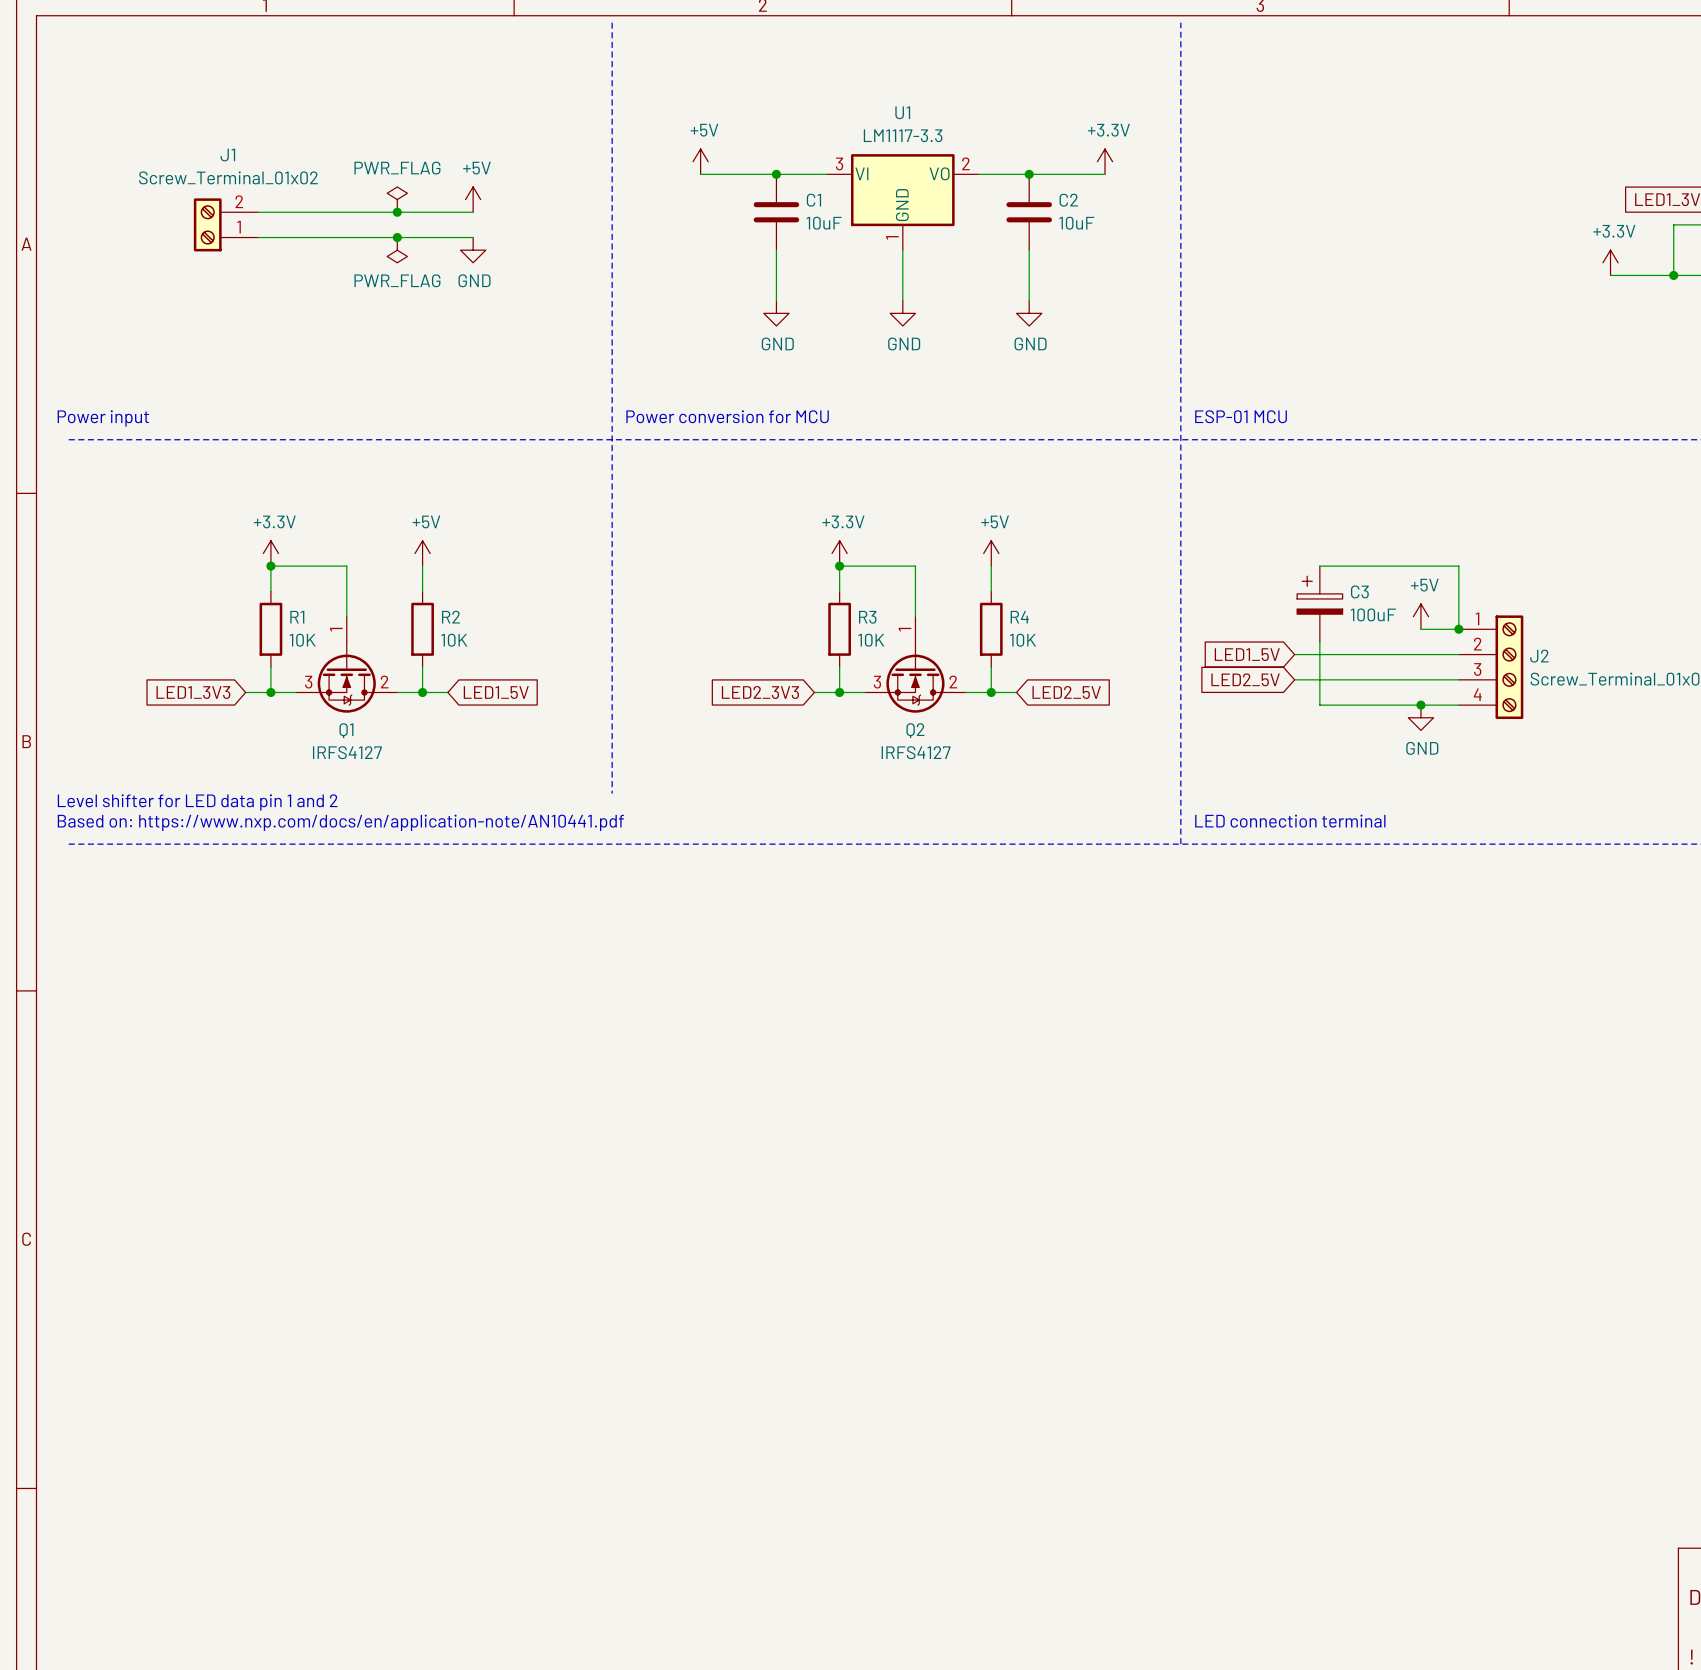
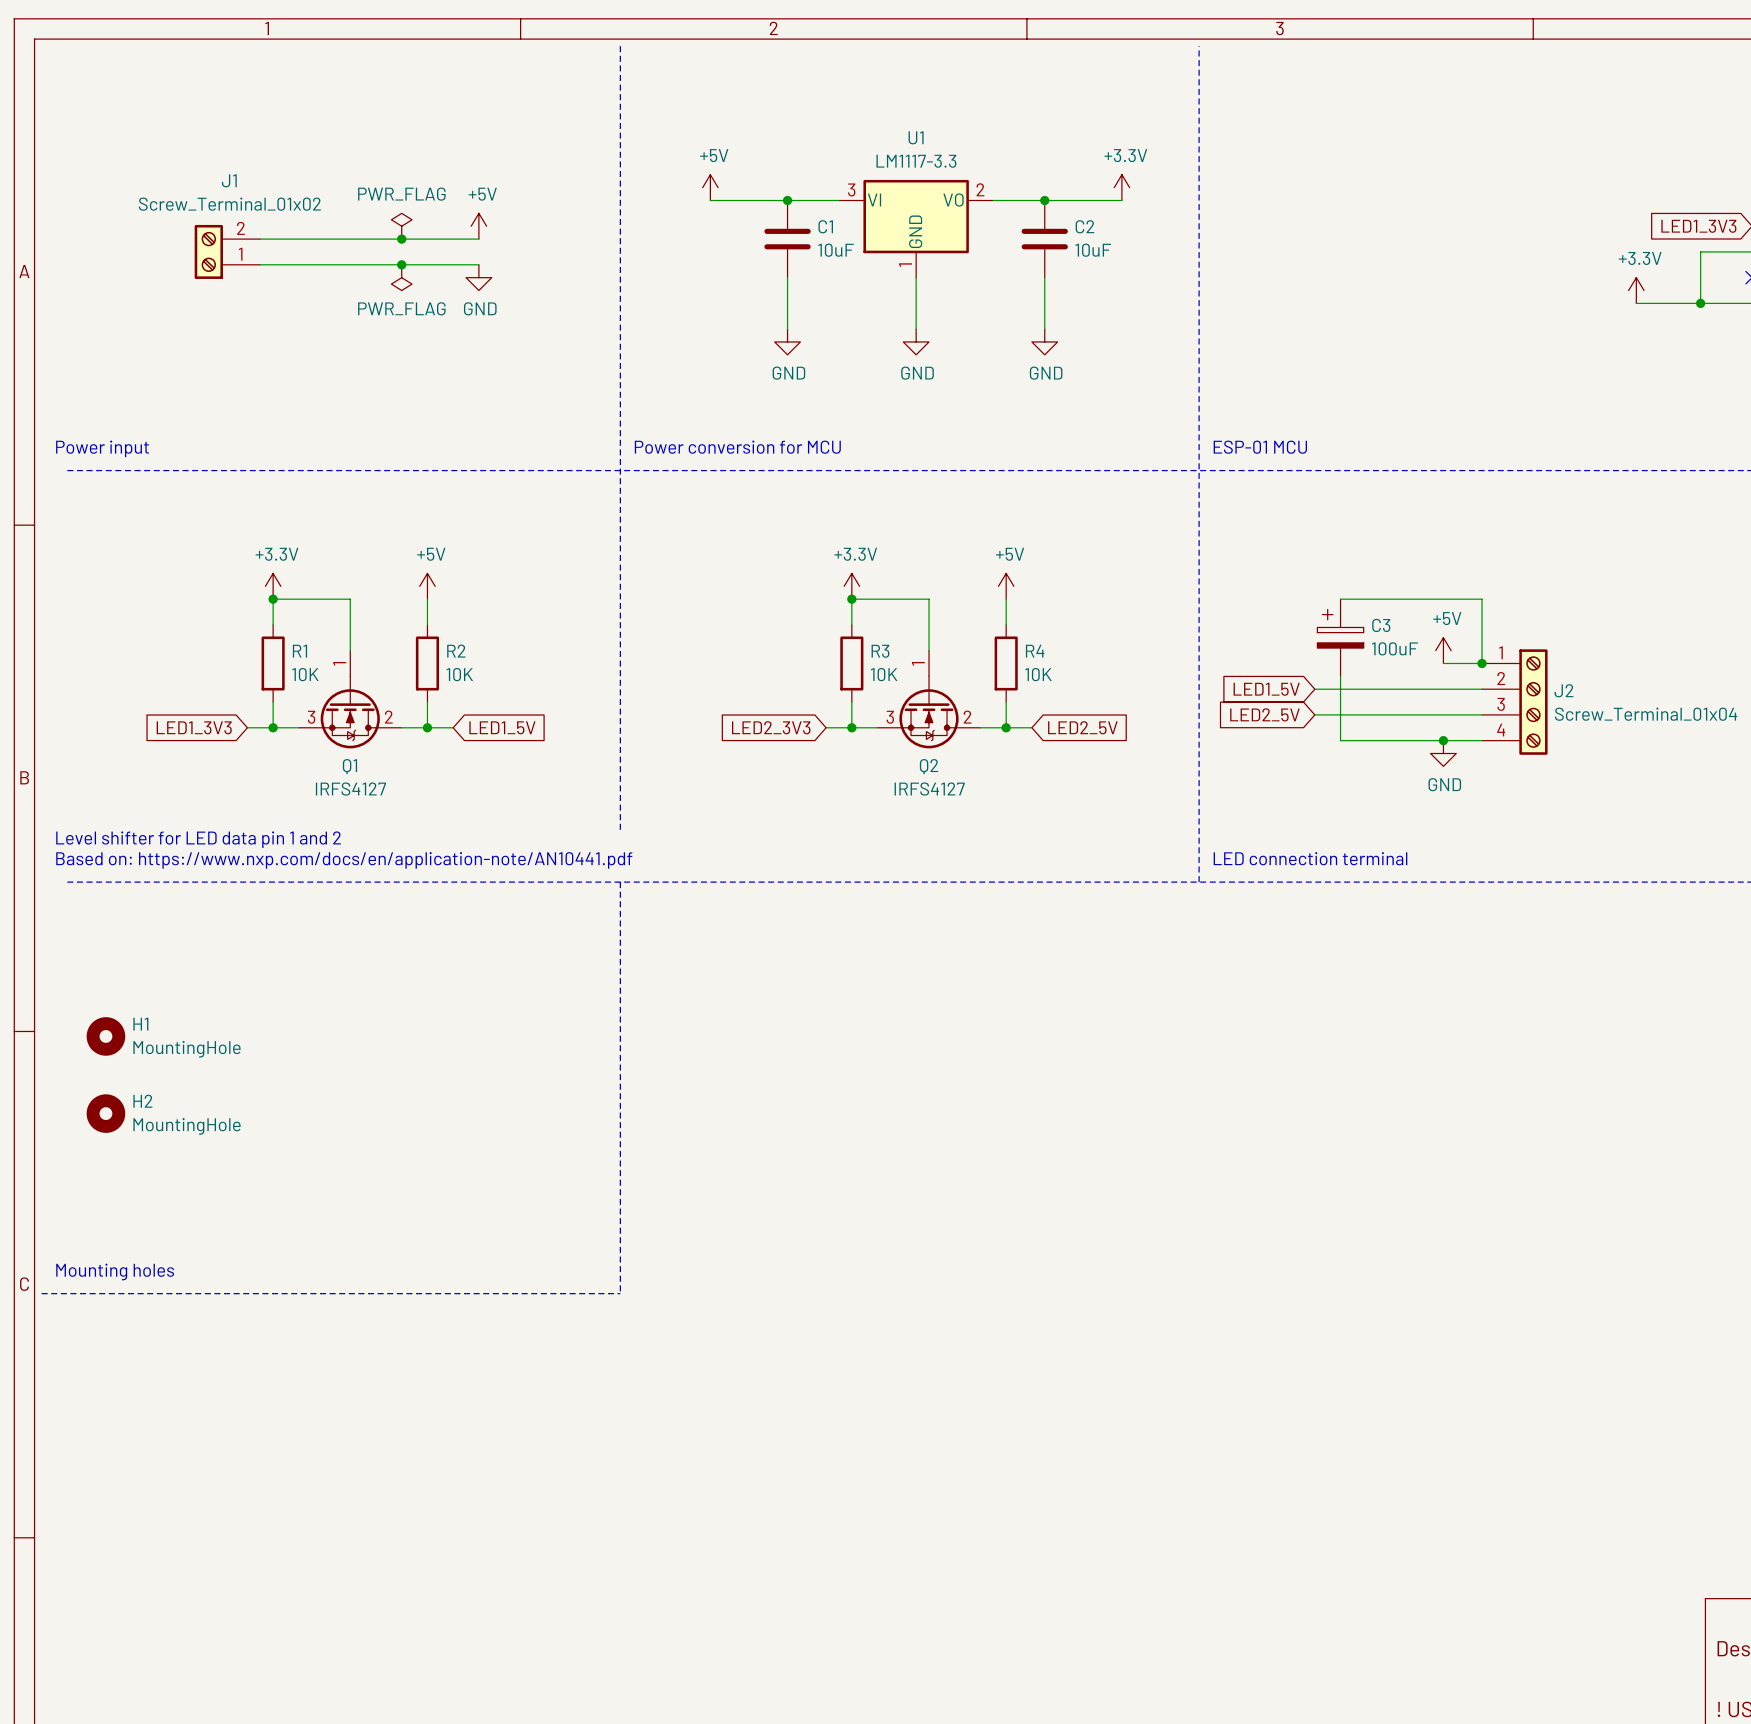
line: none -> (620, 882) (620, 1293) (41, 1293)
H1: none -> MountingHole (105, 1036)
H2: none -> MountingHole (105, 1113)
text: none -> Mounting holes (115, 1271)

